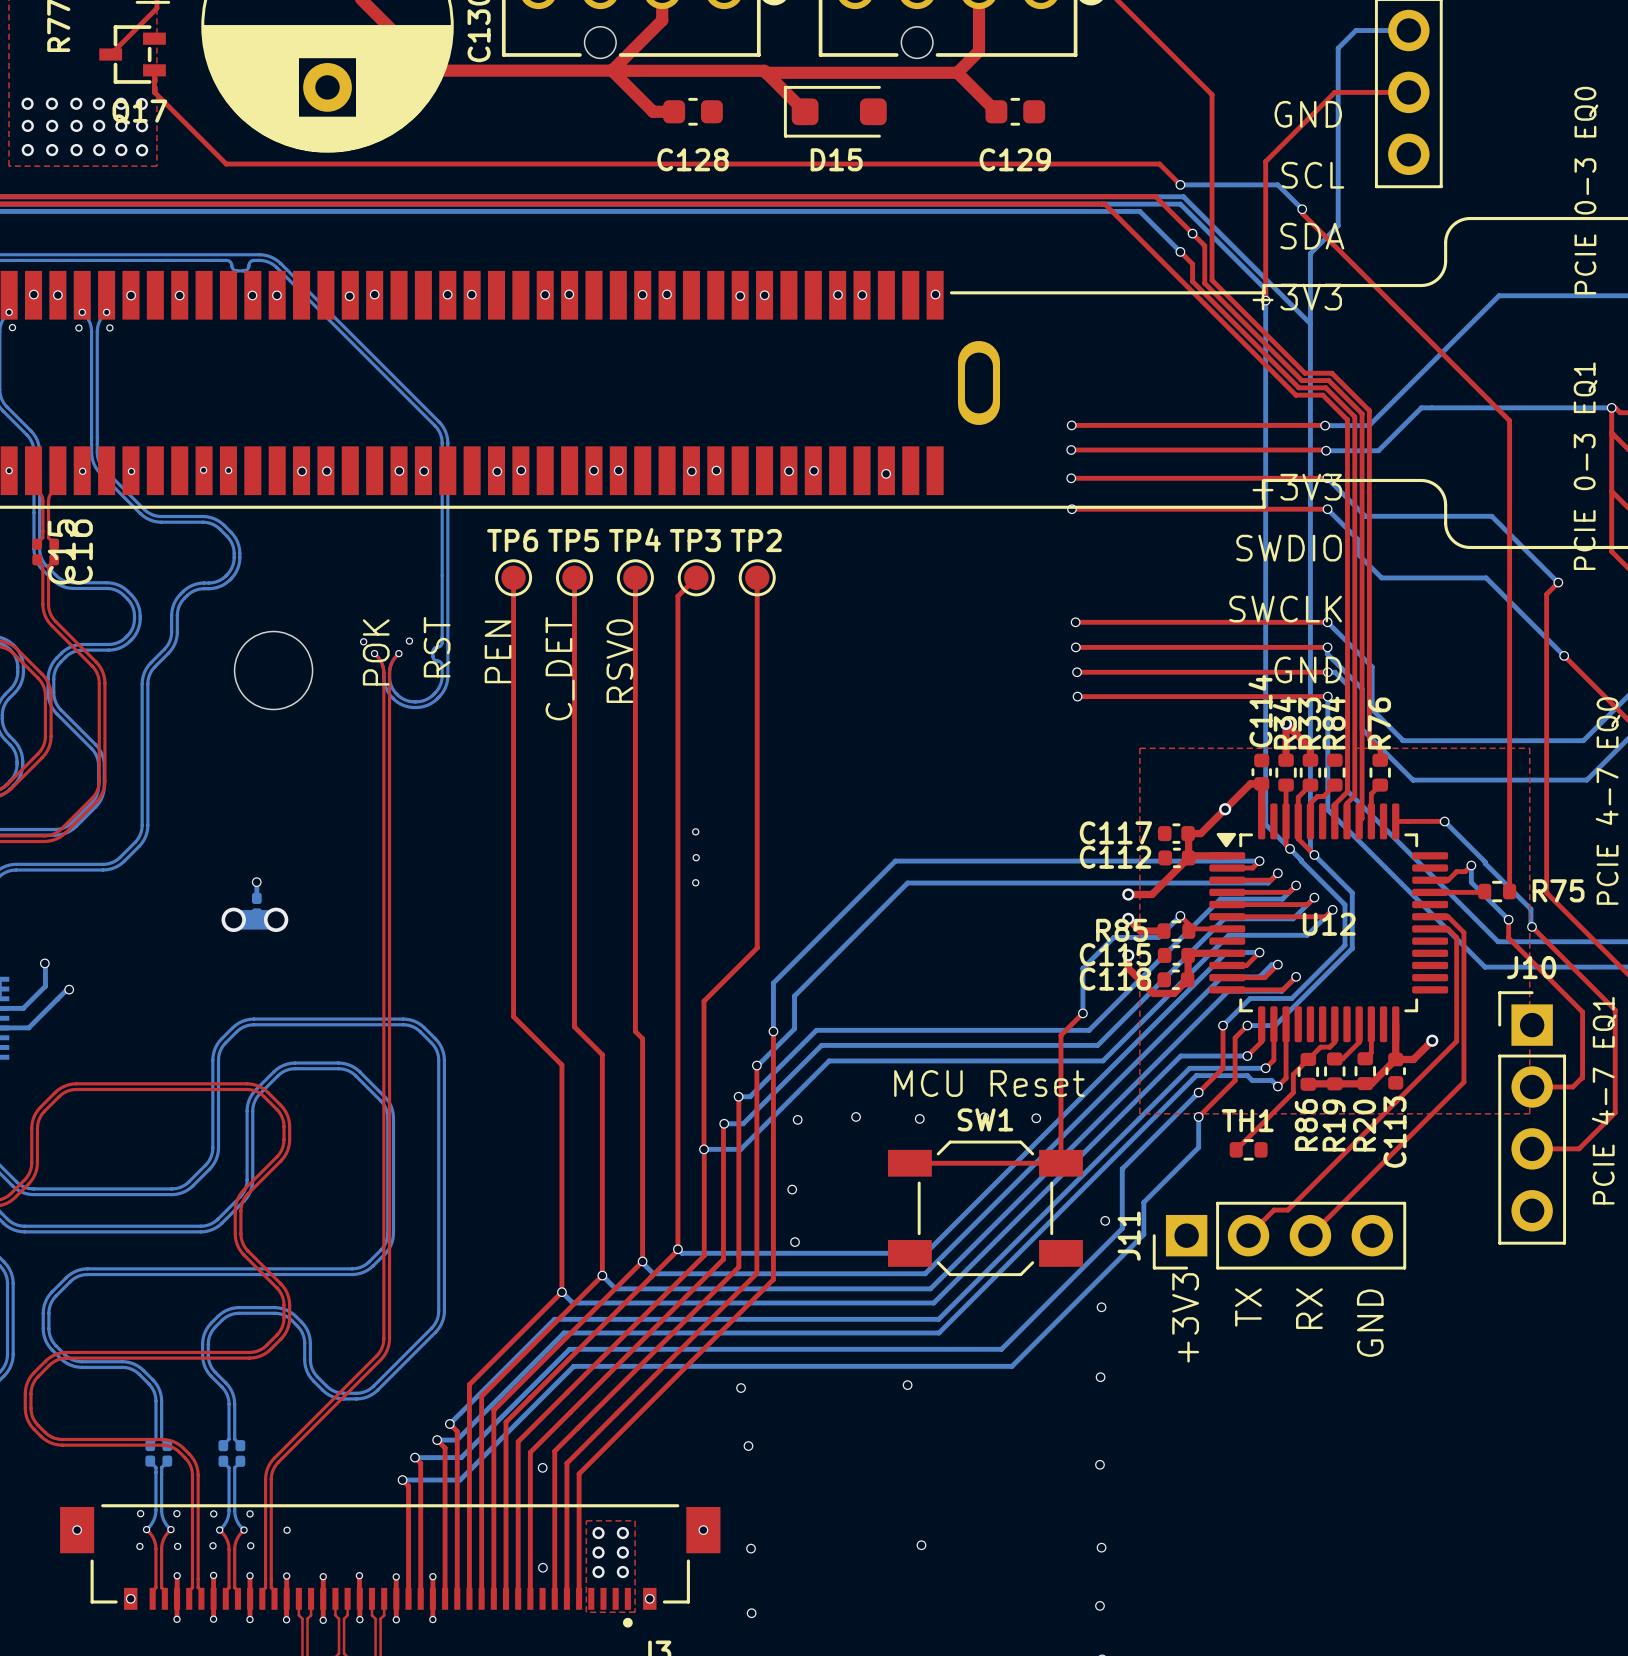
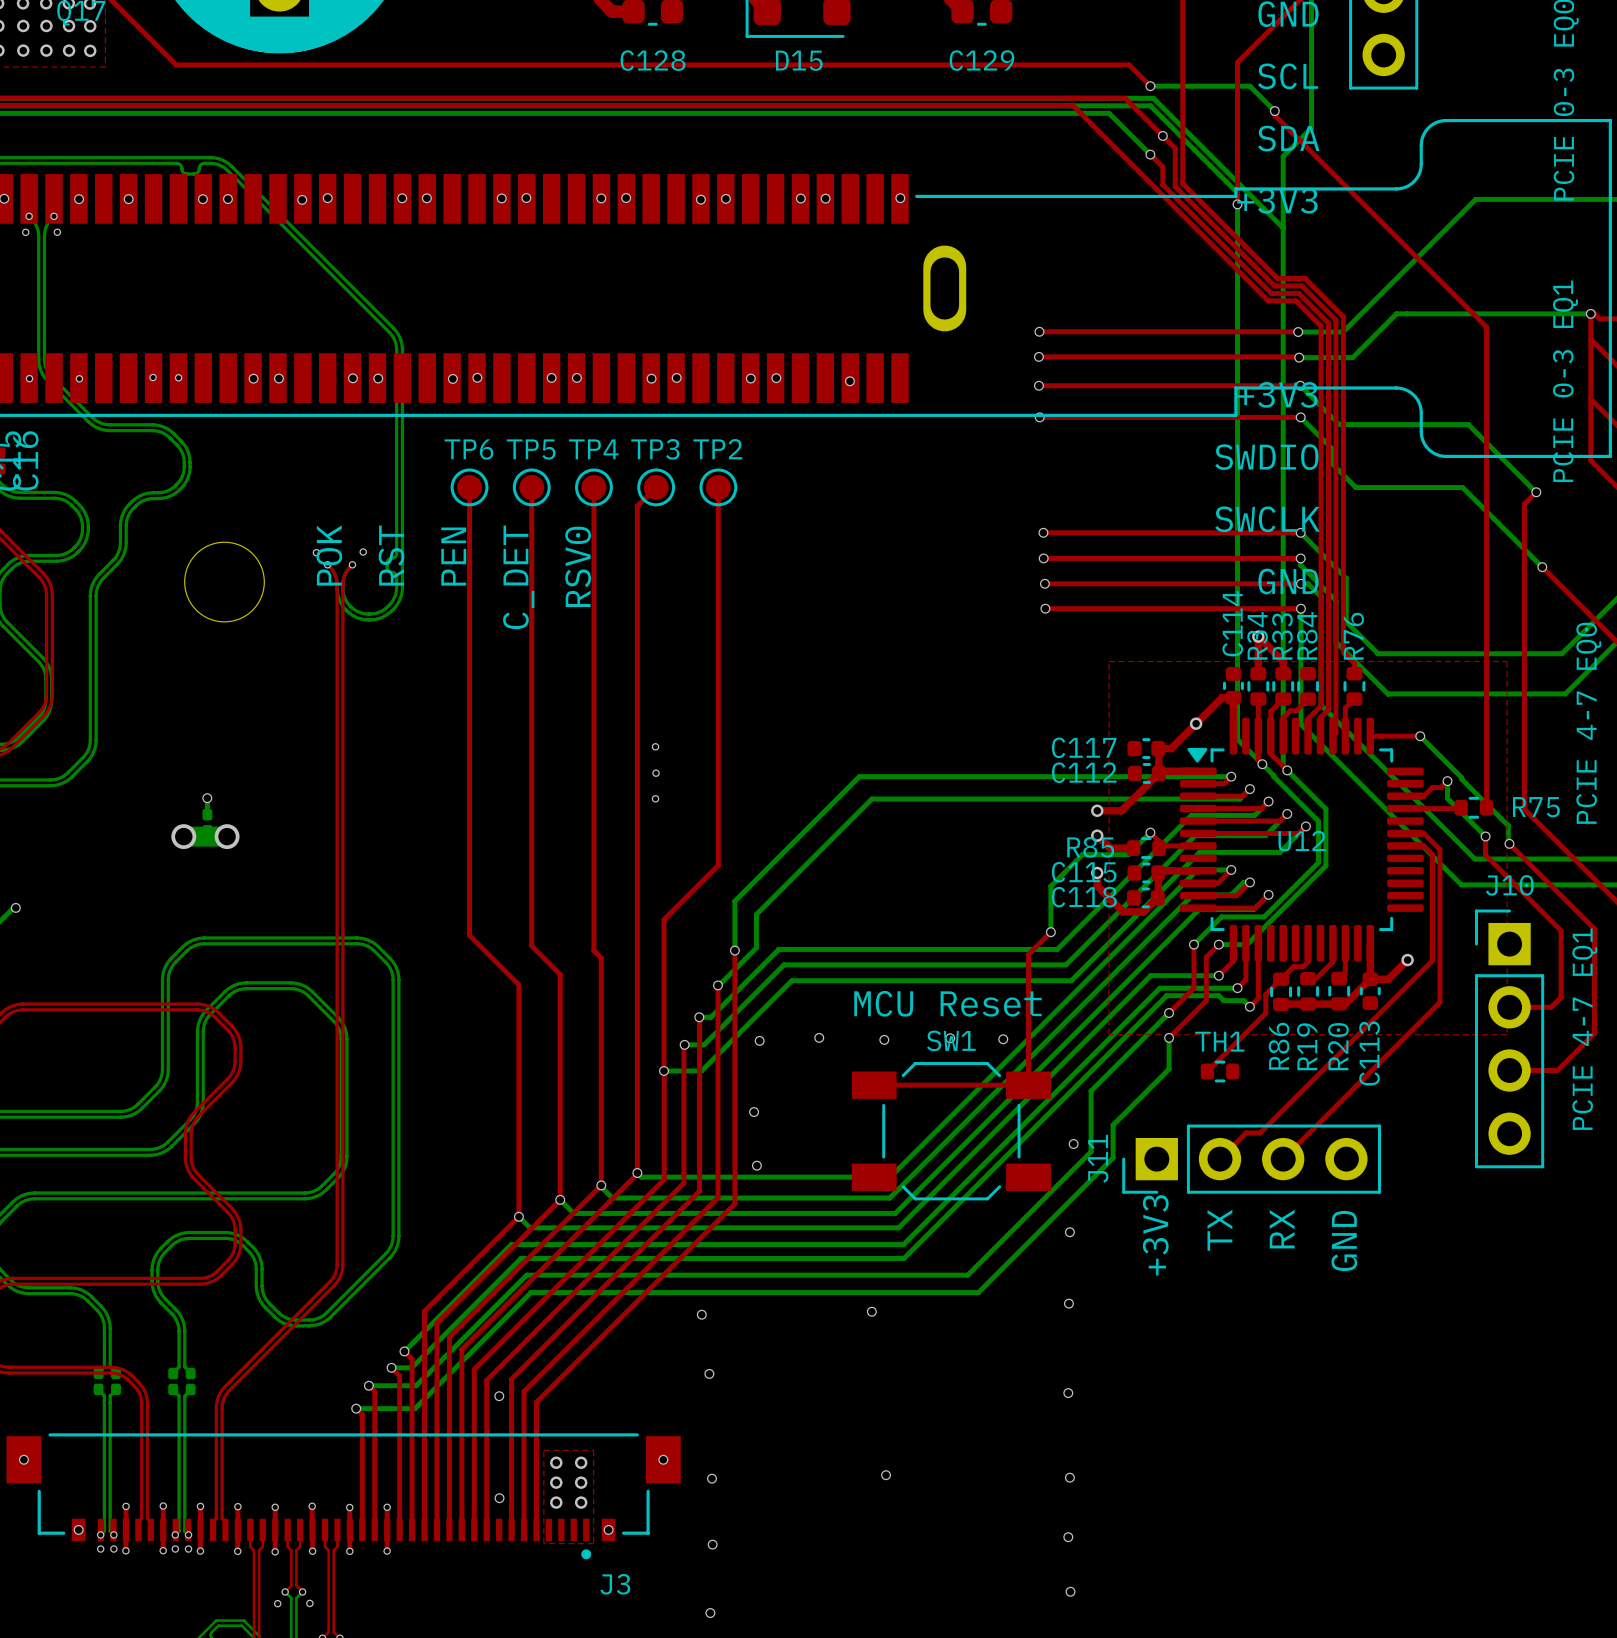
bottom track: (155, 1510) (153, 1521) (146, 1529) -> (104, 1439) (104, 1531) (100, 1534)
bottom track: (161, 1510) (164, 1521) (170, 1529) -> (110, 1439) (110, 1531) (113, 1534)
bottom track: (229, 1510) (226, 1522) (219, 1530) -> (179, 1439) (179, 1531) (175, 1534)
bottom track: (234, 1510) (237, 1522) (244, 1530) -> (184, 1439) (184, 1531) (188, 1534)
via: (140, 1513) -> none
via: (176, 1513) -> none
via: (213, 1513) -> none
via: (250, 1513) -> none
top track: (146, 1529) (153, 1537) (155, 1546) (155, 1587) (152, 1590) (152, 1598) -> none
via: (146, 1529) -> none
top track: (170, 1529) (164, 1537) (161, 1546) (161, 1587) (164, 1590) (164, 1598) -> none
via: (170, 1529) -> none
top track: (219, 1530) (226, 1538) (228, 1547) (229, 1587) (225, 1590) (225, 1598) -> none
via: (219, 1530) -> none
top track: (244, 1530) (237, 1538) (234, 1547) (234, 1587) (237, 1590) (237, 1598) -> none
via: (244, 1530) -> none
via: (287, 1530) -> none
via: (212, 1545) -> none
via: (250, 1545) -> none
via: (139, 1546) -> none
via: (177, 1546) -> none
via: none -> (100, 1534)
via: none -> (113, 1534)
via: none -> (175, 1534)
via: none -> (188, 1534)
via: none -> (100, 1549)
via: none -> (113, 1549)
via: none -> (175, 1549)
via: none -> (188, 1549)

